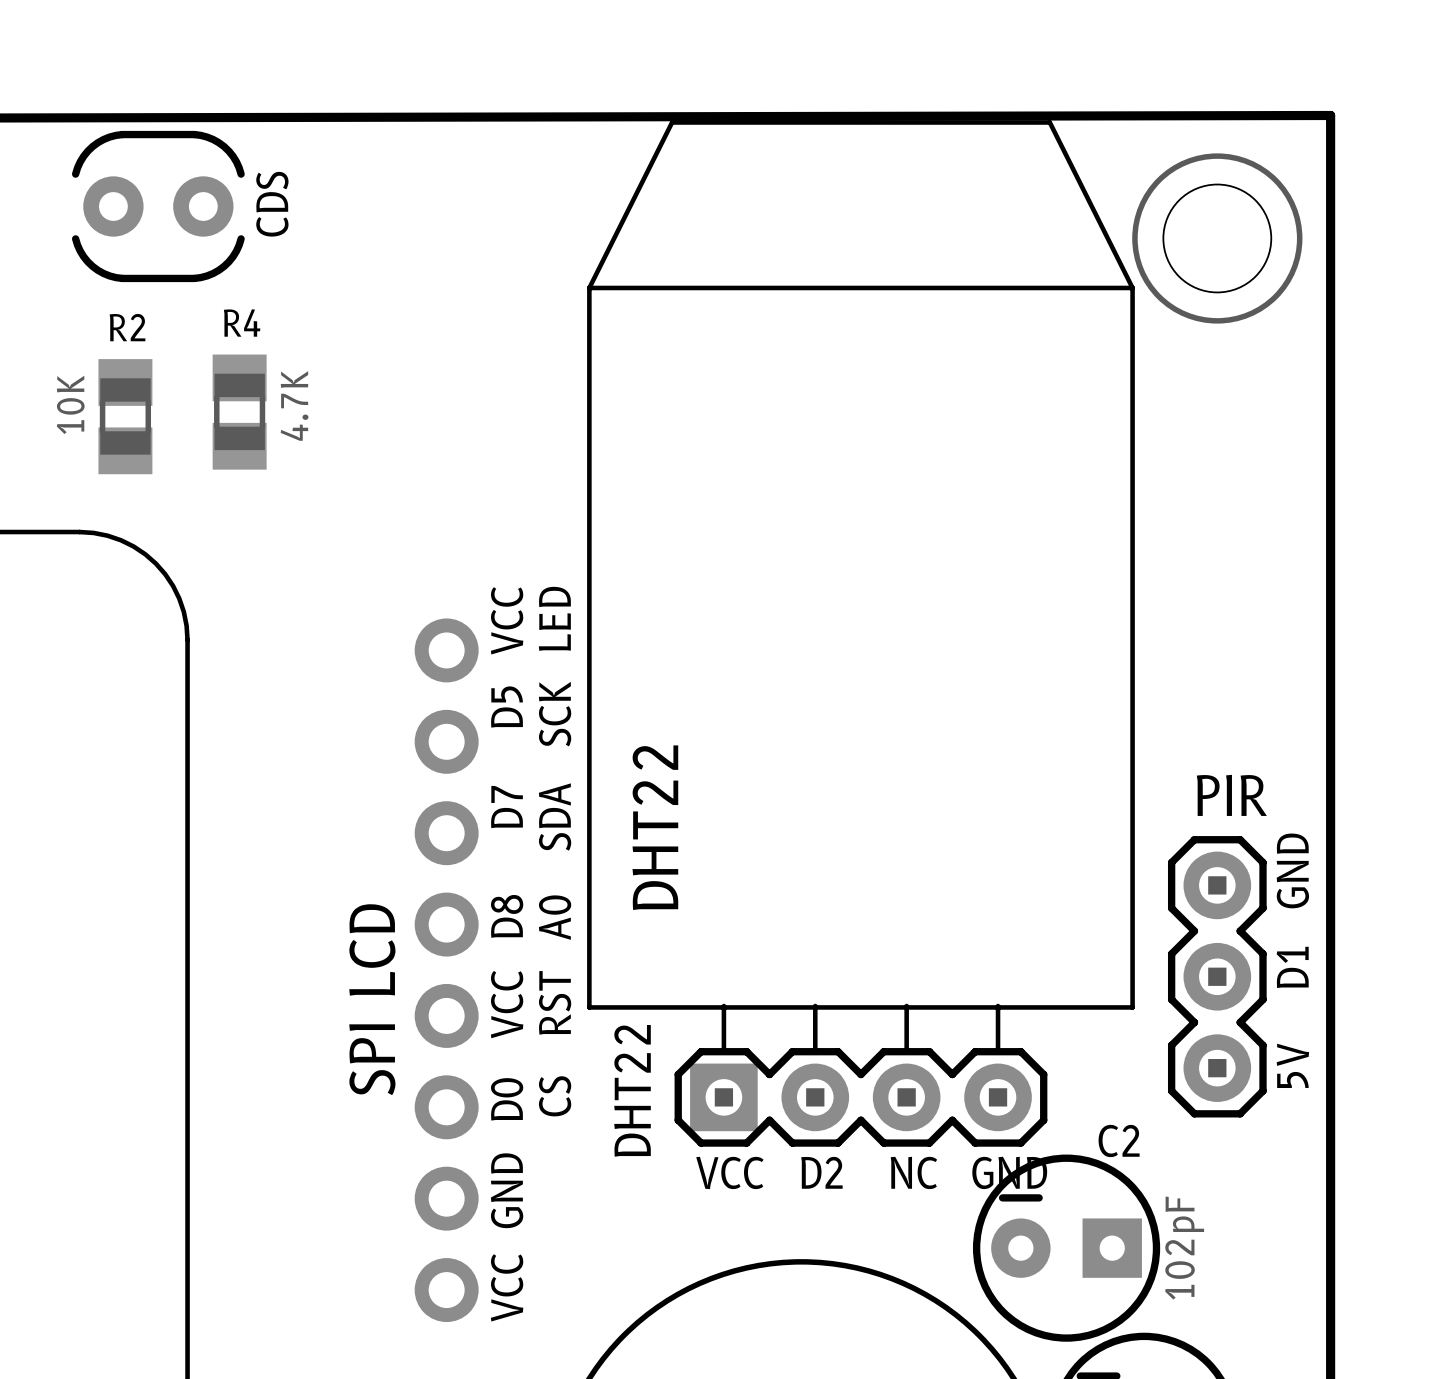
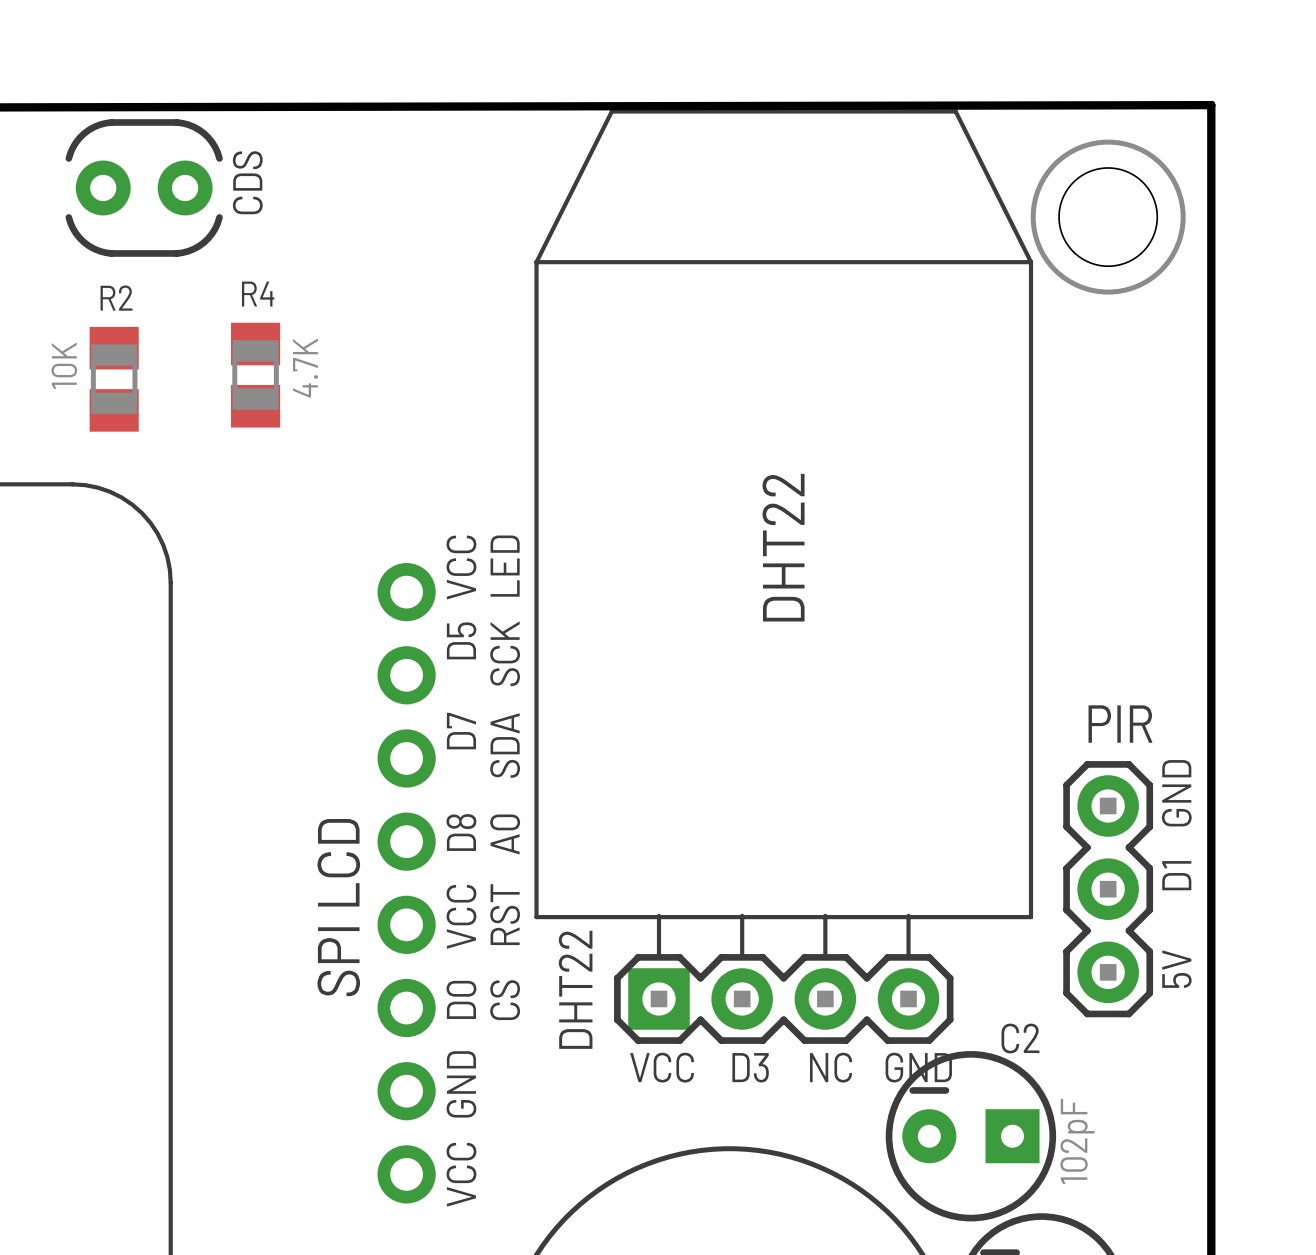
R4 position: (239, 412) -> (255, 375)
DHT22 name position: DHT22 (655, 827) -> DHT22 (783, 547)
text: D2 (821, 1172) -> D3 (750, 1067)

